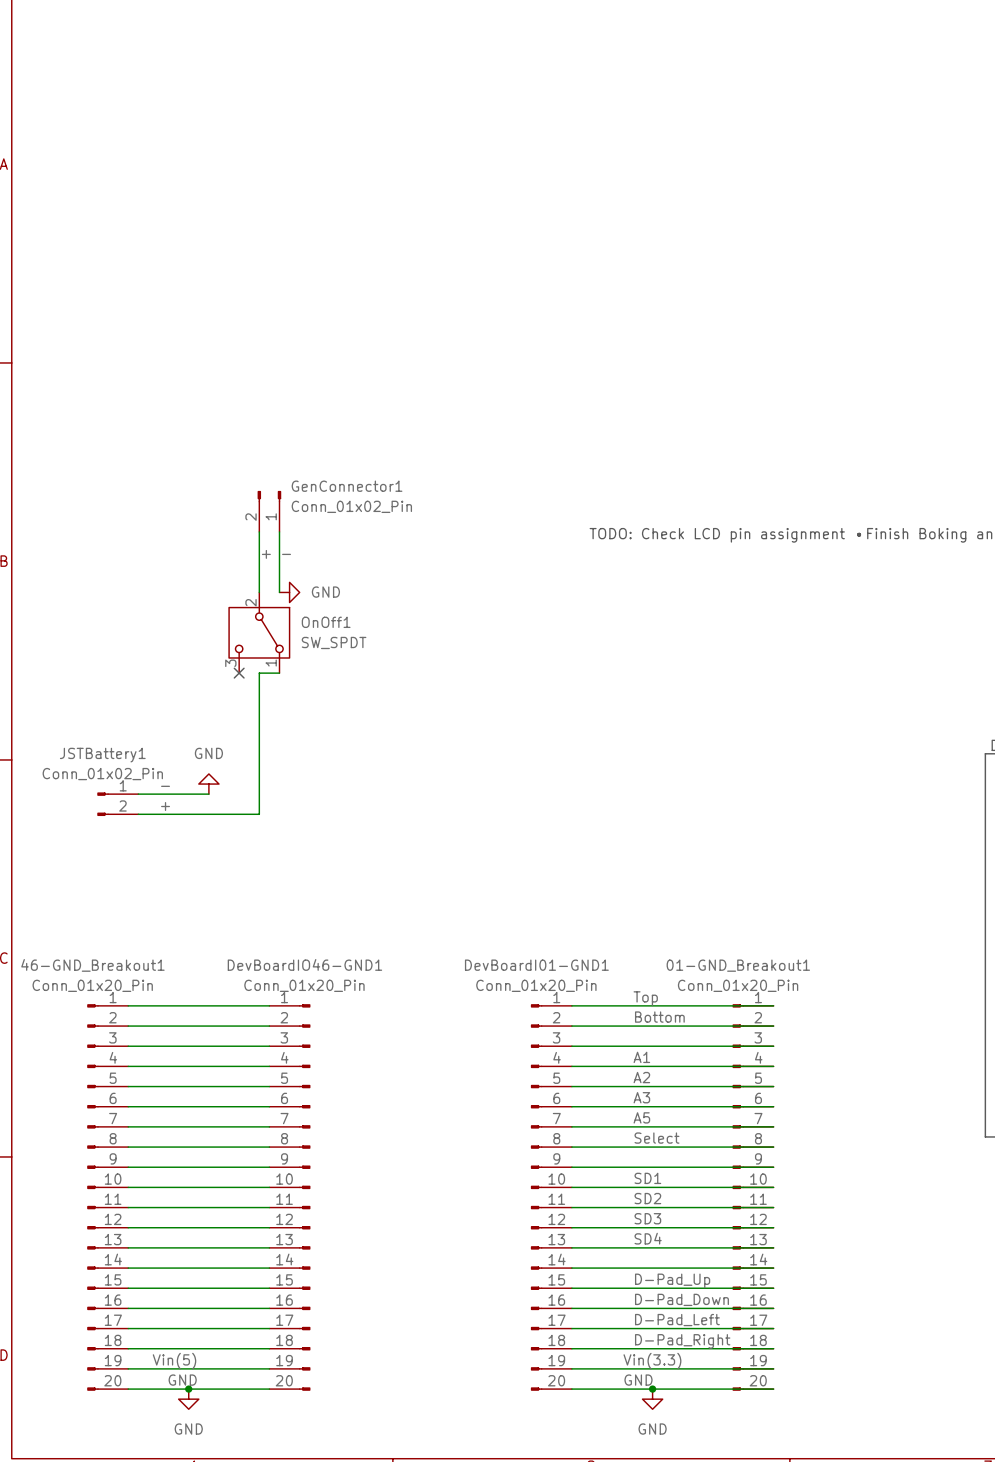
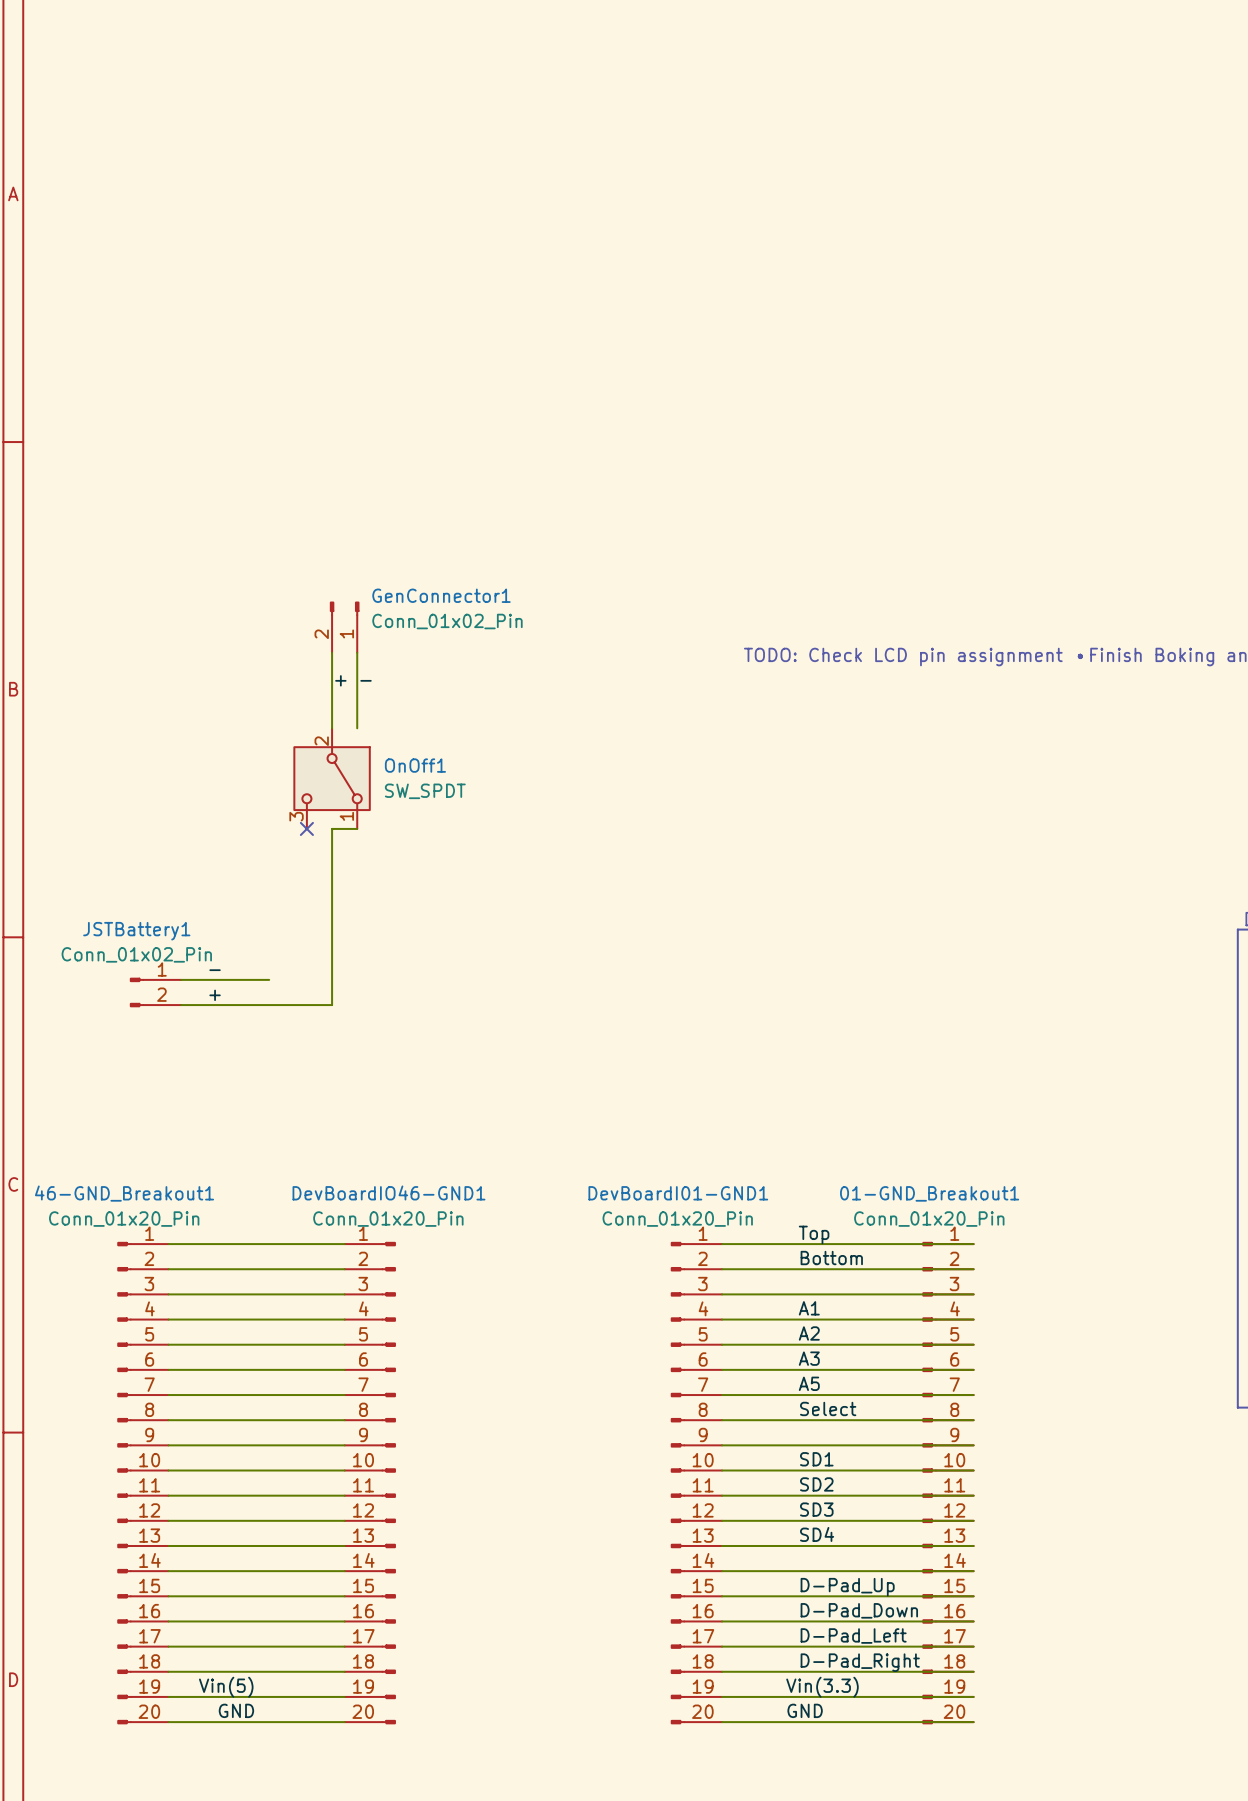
power symbol: GND (289, 592) -> none
power symbol: GND (208, 784) -> none
junction: (188, 1389) -> none
junction: (652, 1389) -> none
power symbol: GND (188, 1399) -> none
power symbol: GND (652, 1399) -> none

